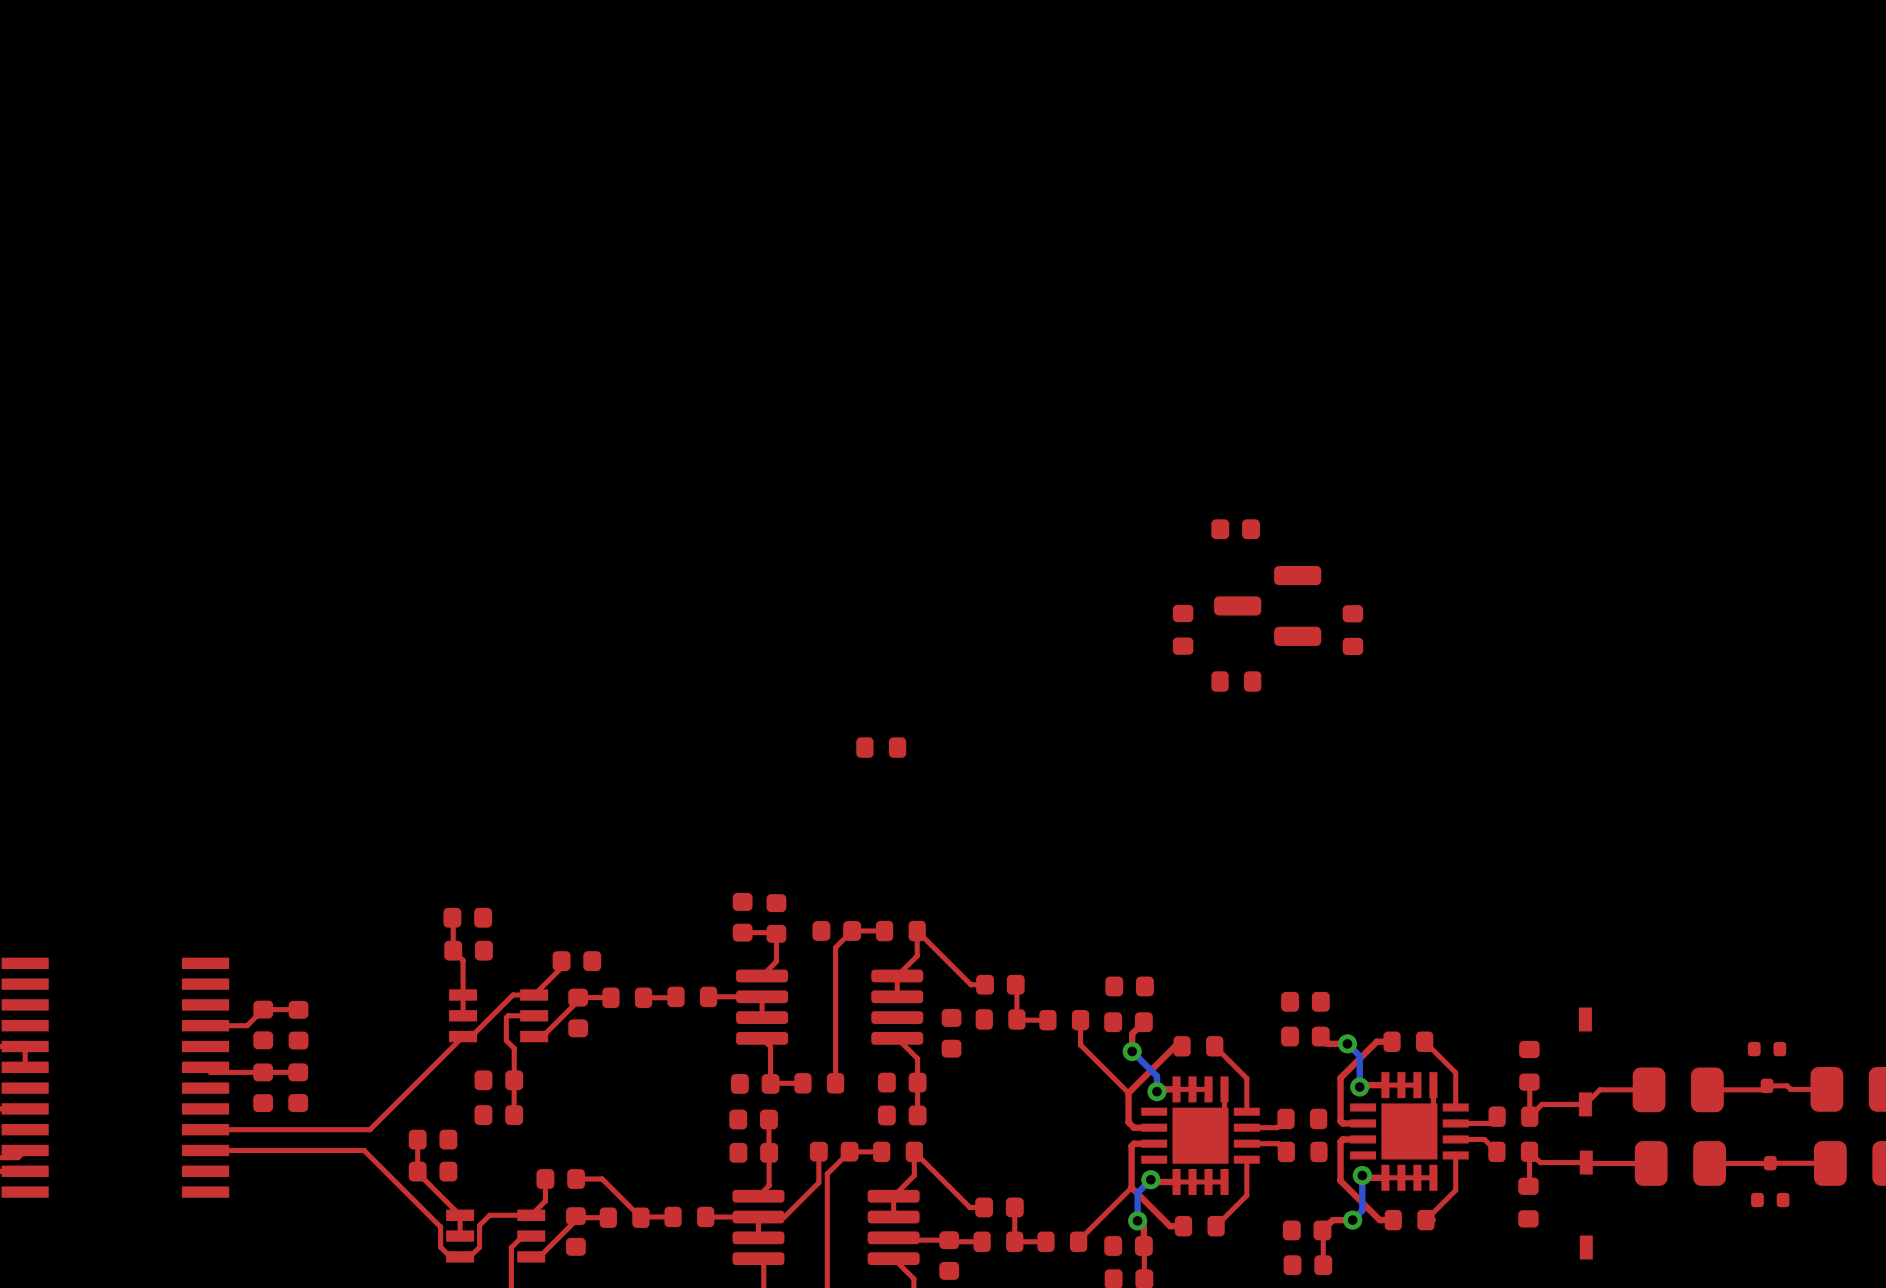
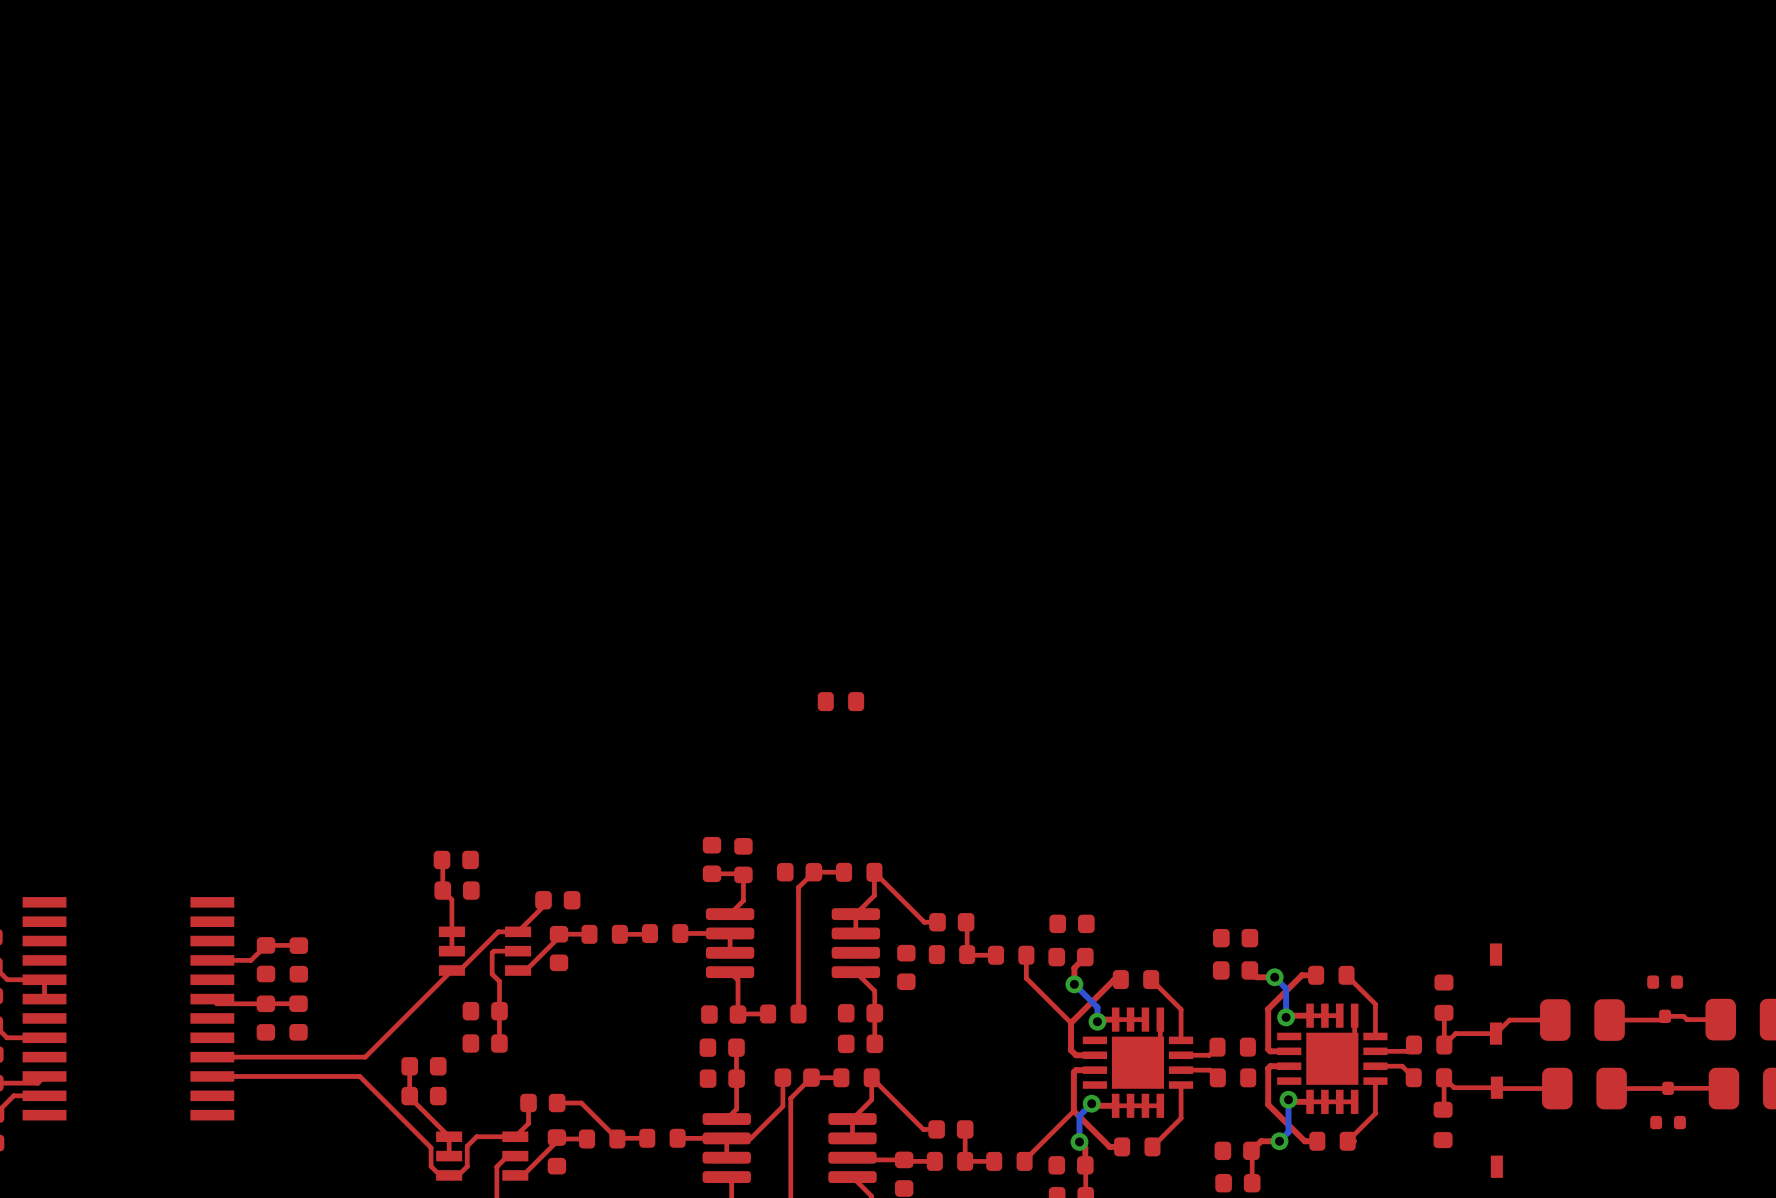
part: (1235, 529) -> none
part: (1267, 605) -> none
part: (1183, 629) -> none
part: (1352, 630) -> none
part: (1236, 681) -> none

